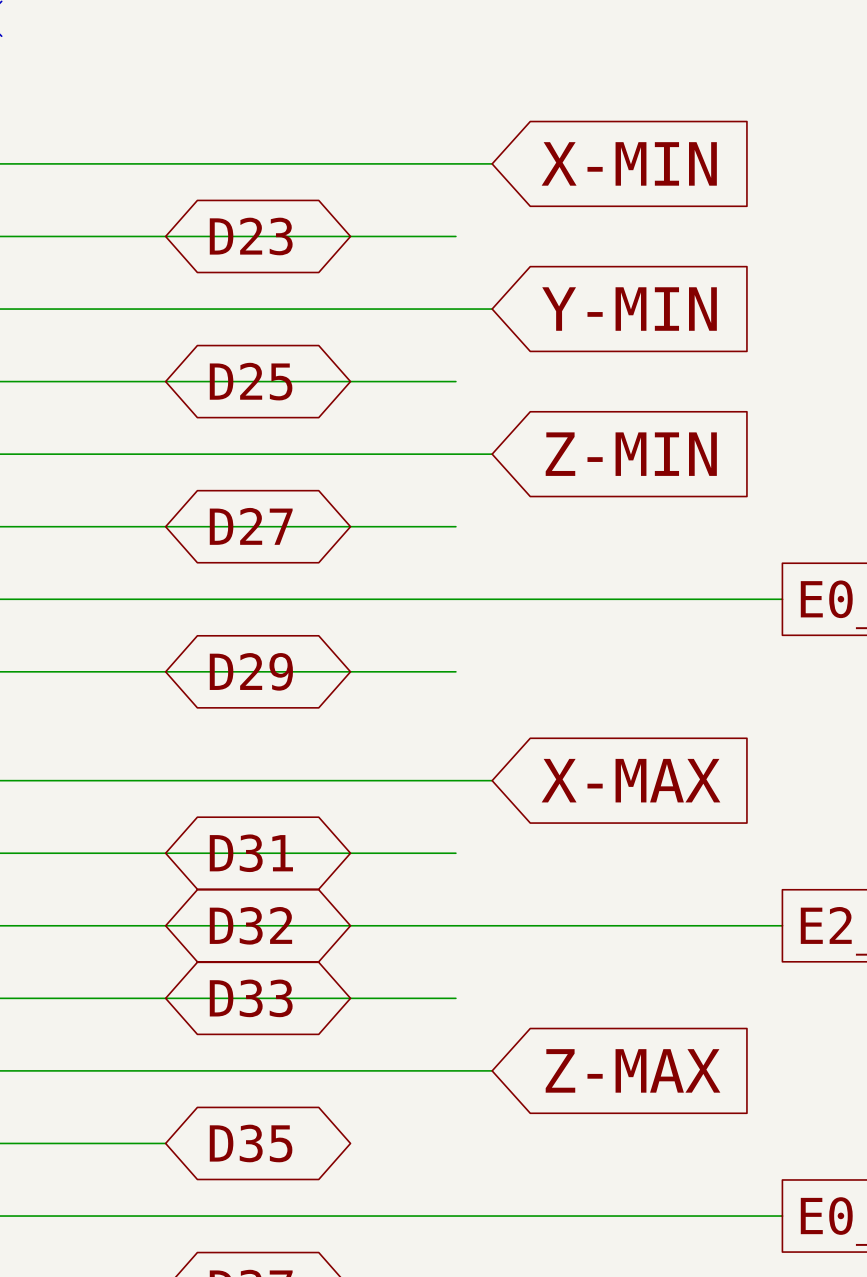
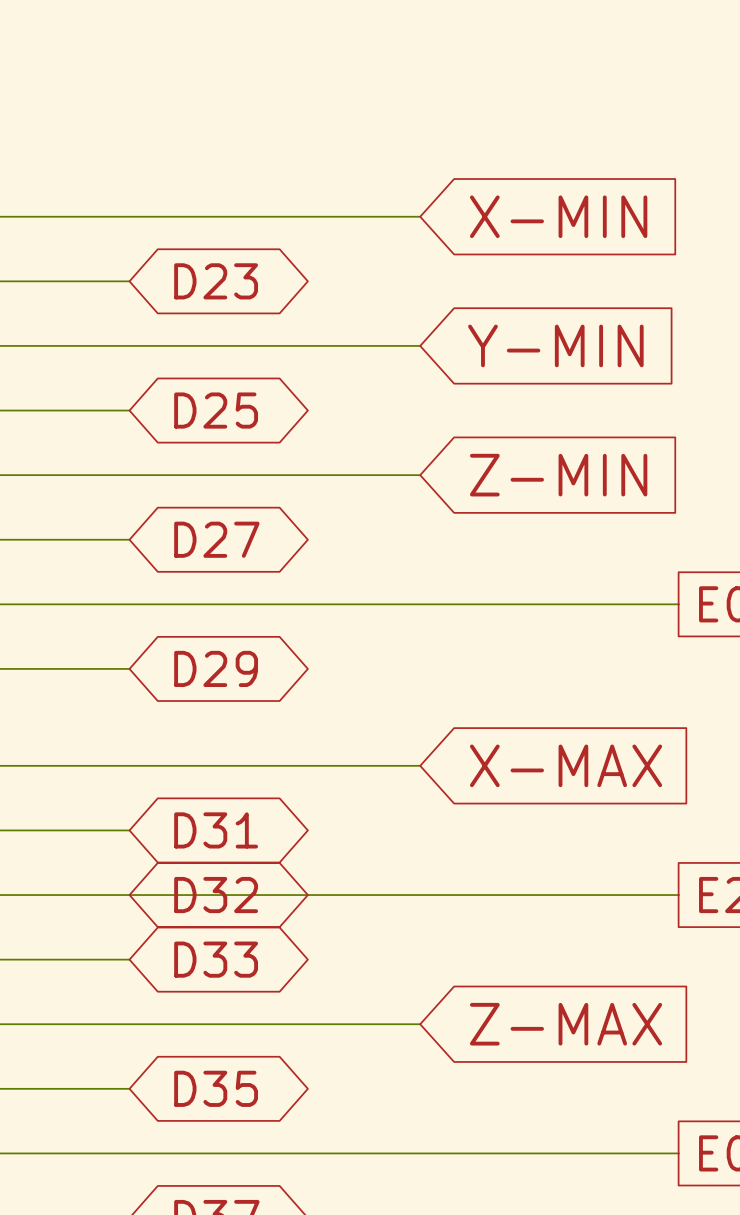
wire: (165, 236) (455, 236) -> none
wire: (165, 381) (455, 381) -> none
wire: (165, 526) (455, 526) -> none
wire: (165, 671) (455, 671) -> none
wire: (165, 853) (455, 853) -> none
wire: (165, 998) (455, 998) -> none

